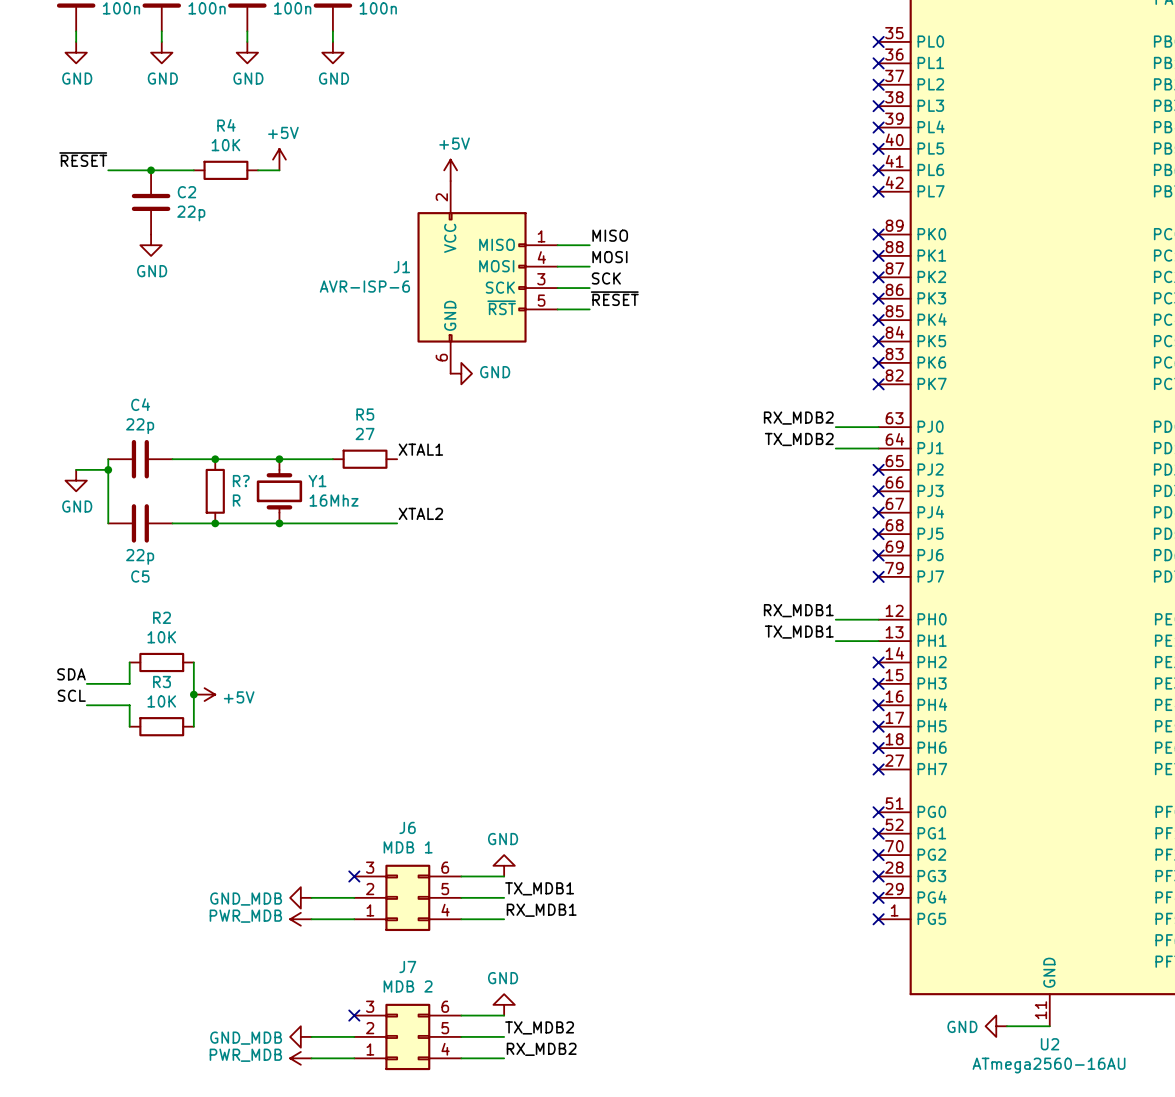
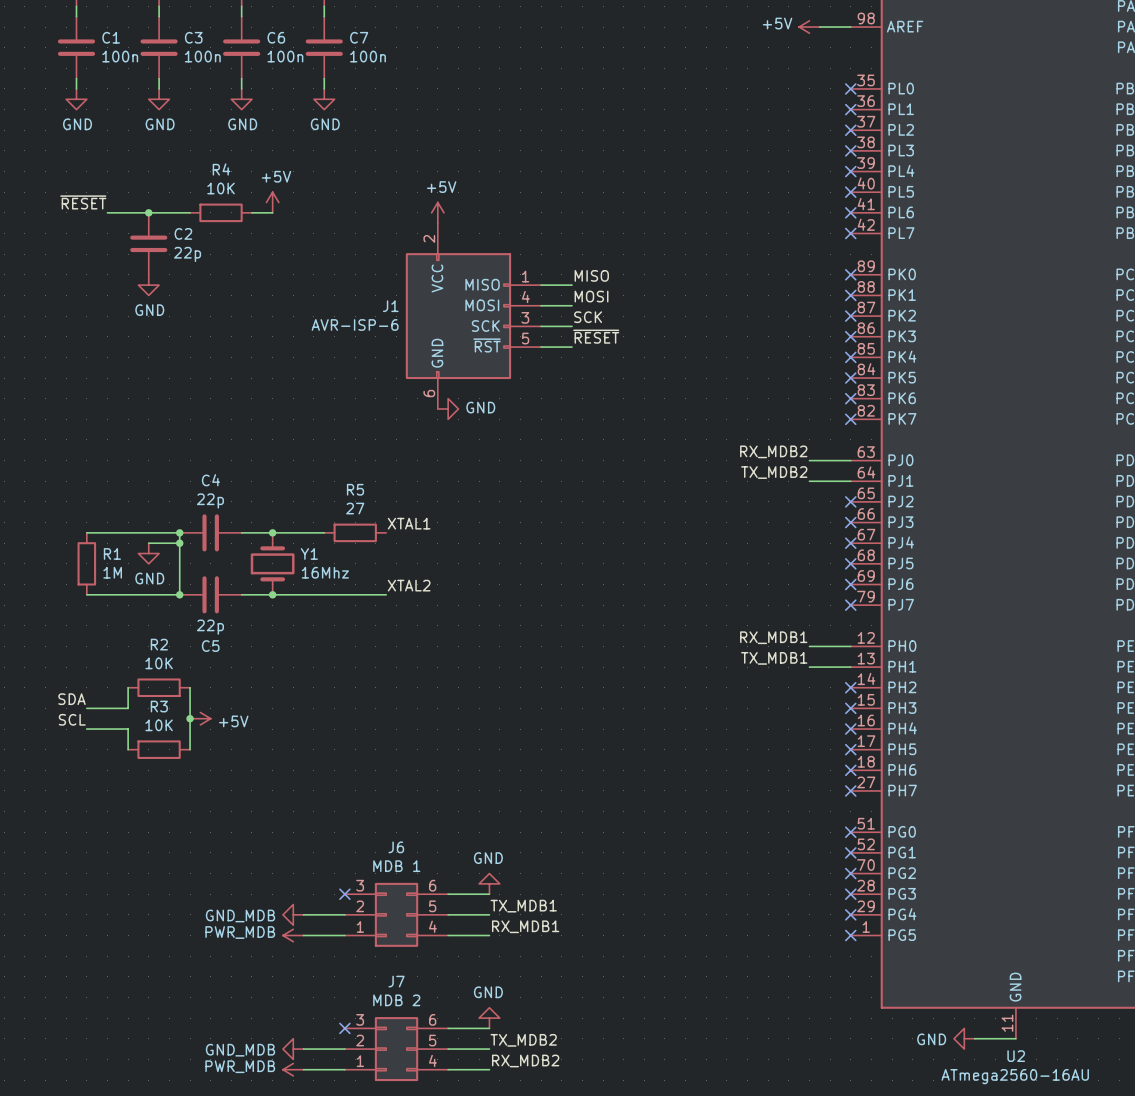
label position: XTAL1 (420, 449) -> XTAL1 (409, 523)
wire: (108, 459) (108, 523) -> none
C4 position: (140, 459) -> (210, 532)
wire: (172, 459) (332, 459) -> none
junction: (215, 459) -> none
junction: (279, 459) -> none
R5 position: (365, 459) -> (355, 532)
wire: (76, 469) (108, 469) -> (148, 543) (179, 543)
junction: (108, 469) -> none
power symbol position: GND (76, 480) -> GND (148, 553)
R?: R (215, 491) -> none
Y1 position: (279, 491) -> (272, 563)
wire: none -> (86, 532) (179, 532) (179, 594) (86, 594)
junction: none -> (179, 532)
wire: none -> (241, 532) (324, 532)
junction: none -> (272, 532)
junction: none -> (179, 543)
label position: XTAL2 (420, 513) -> XTAL2 (409, 585)
C5 position: (140, 523) -> (210, 594)
wire: (172, 523) (397, 523) -> none
junction: (215, 523) -> none
junction: (279, 523) -> none
R1: none -> 1M (86, 563)
junction: none -> (179, 594)
wire: none -> (241, 594) (386, 594)
junction: none -> (272, 594)

